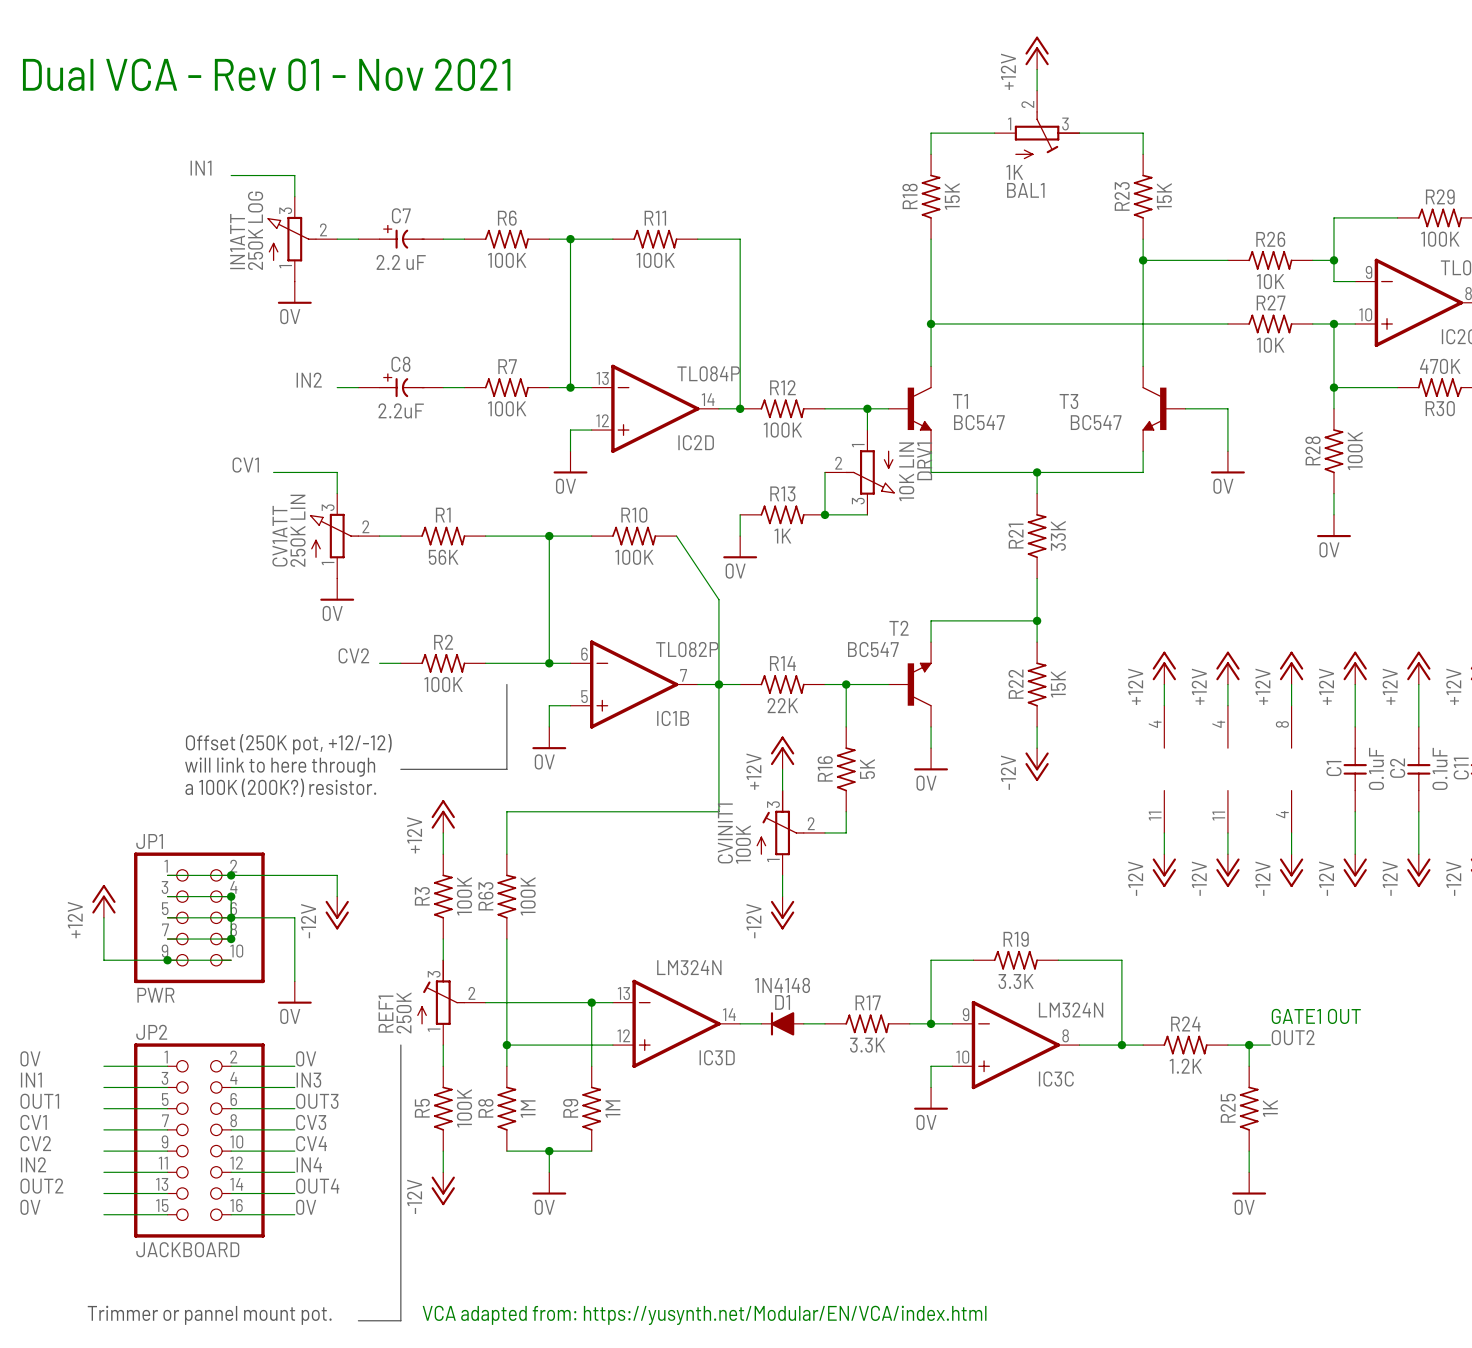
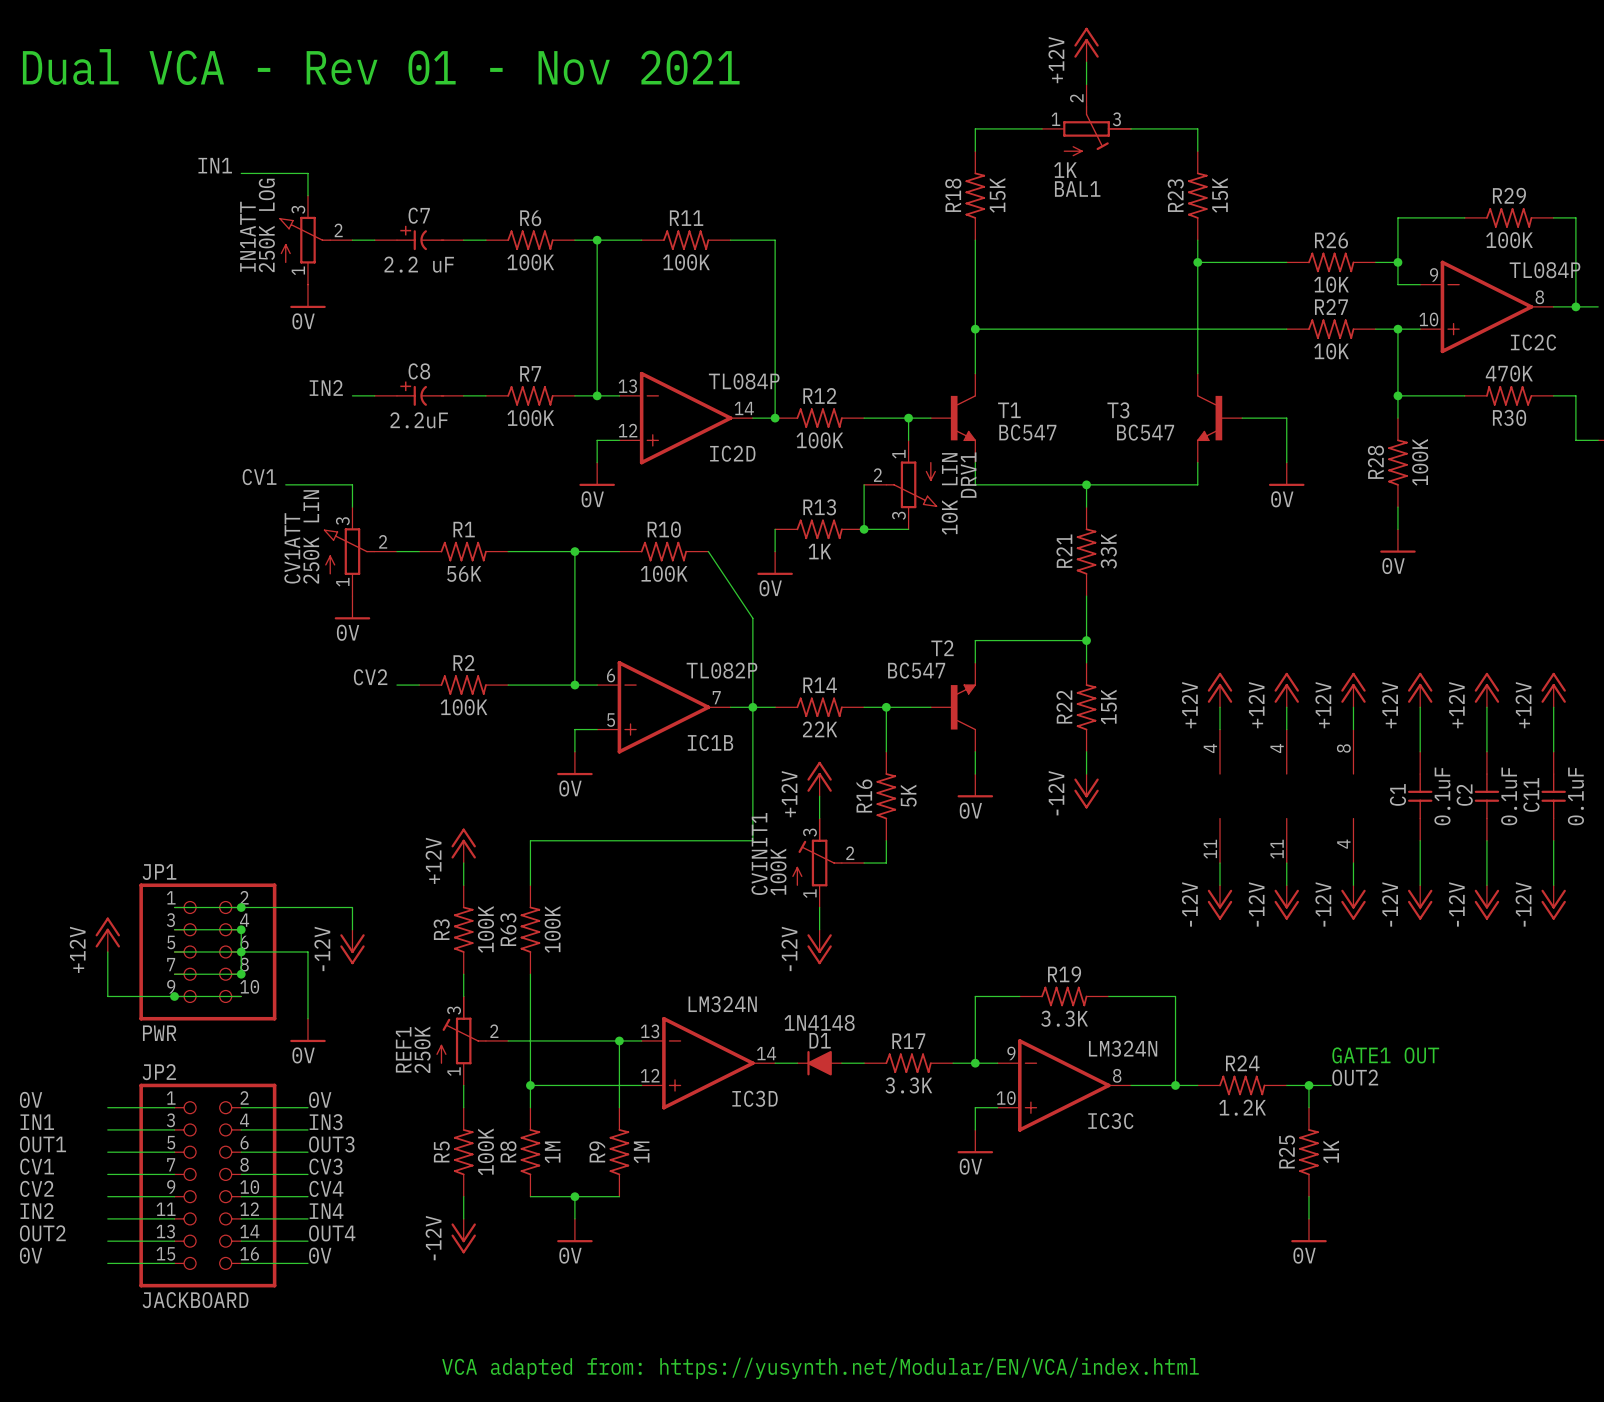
line: (506, 684) (506, 769) (400, 769) -> none
text: Offset (250K pot, +12/-12) (288, 744) -> none
text: will link to here through (280, 767) -> none
text: a 100K (200K?) resistor. (280, 787) -> none
line: (400, 1045) (400, 1320) (358, 1320) -> none
text: Trimmer or pannel mount pot. (209, 1315) -> none

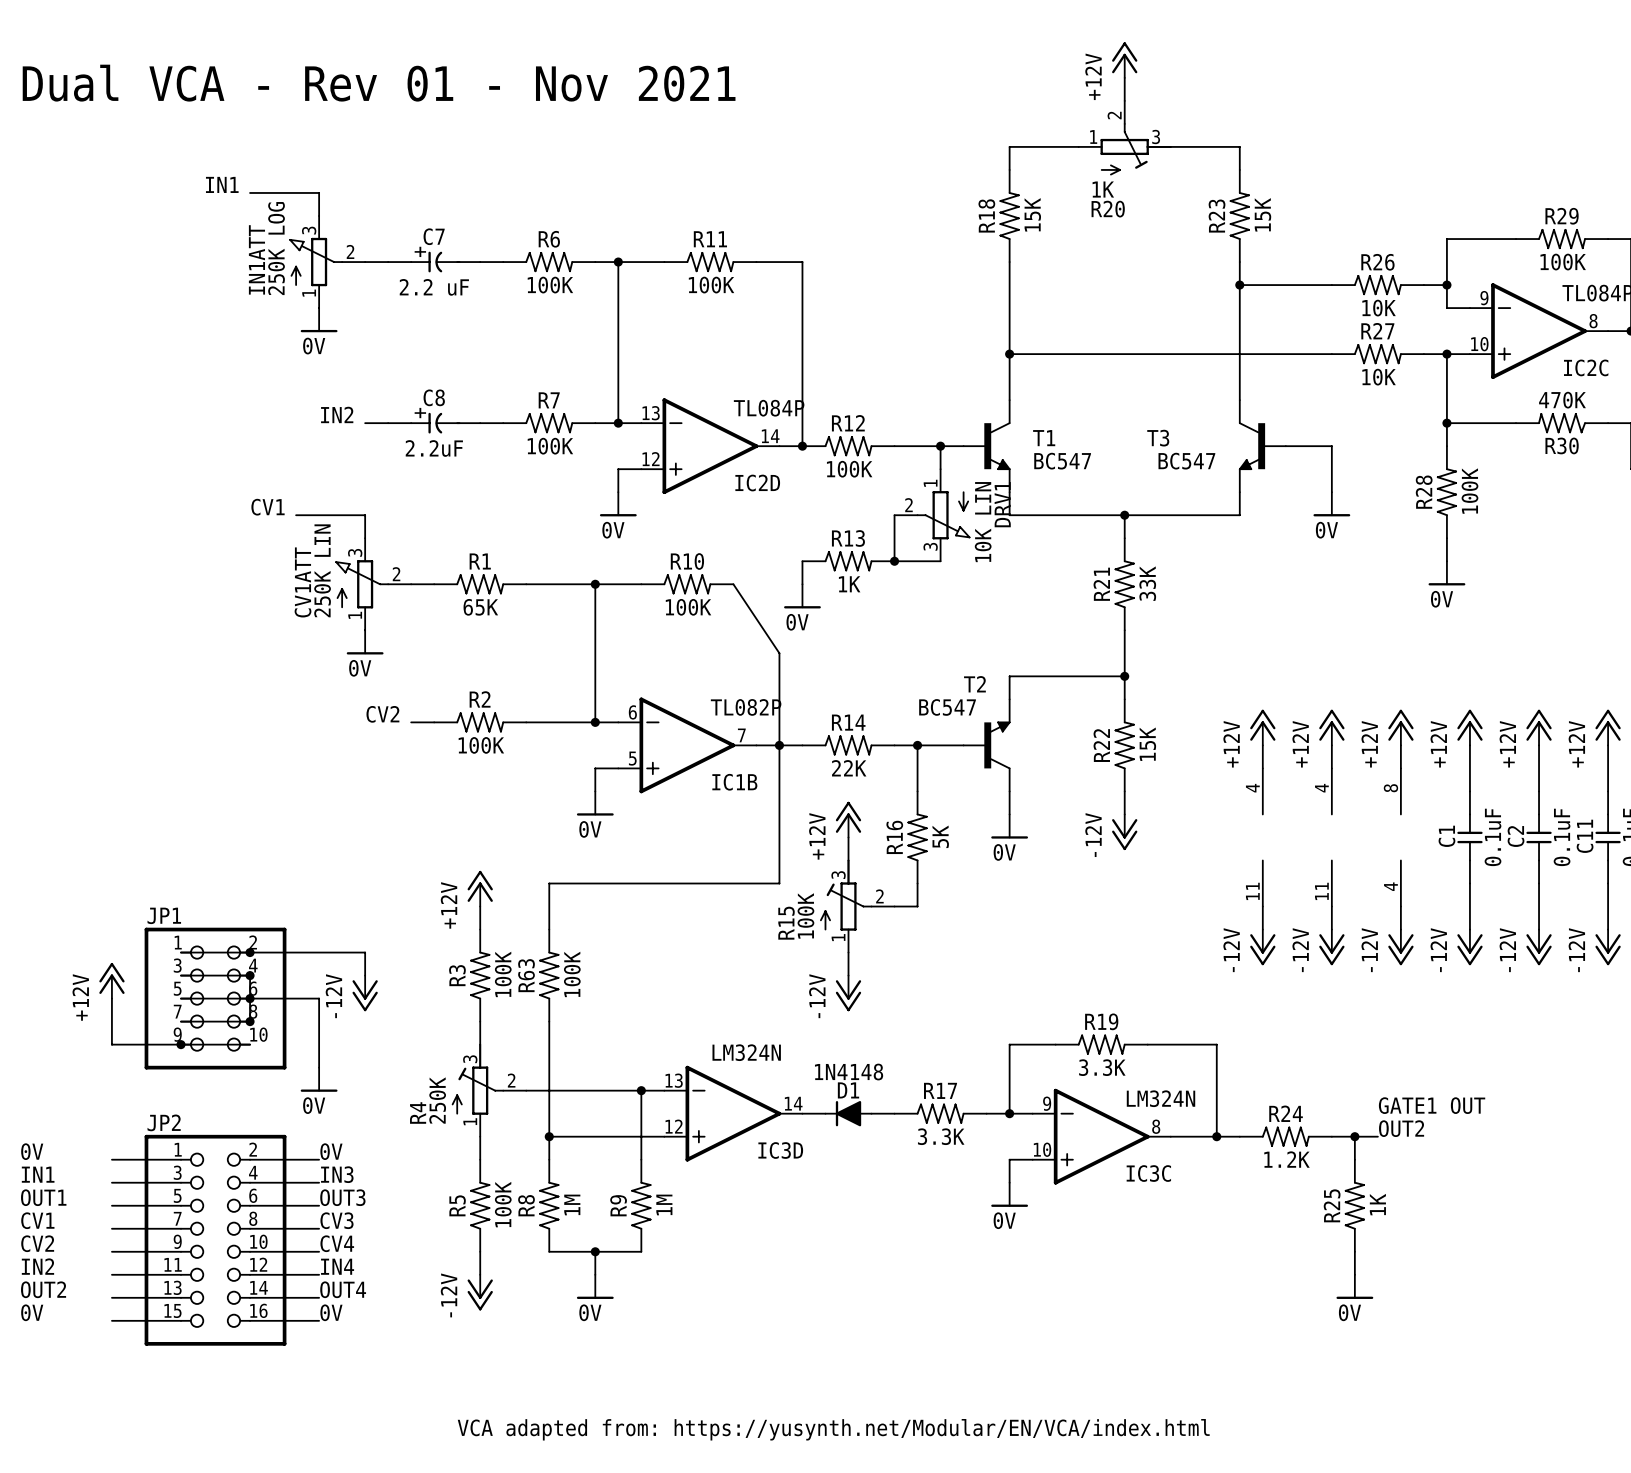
BAL1 name: BAL1 (1077, 189) -> R20 (1108, 209)
R1 value: 56K (464, 573) -> 65K (480, 607)
CVINIT1 name: CVINIT1 (759, 853) -> R15 (786, 923)
JP1 value: PWR (159, 1033) -> none
REF1 name: REF1 (403, 1049) -> R4 (418, 1112)
JP2 value: JACKBOARD (195, 1300) -> none

